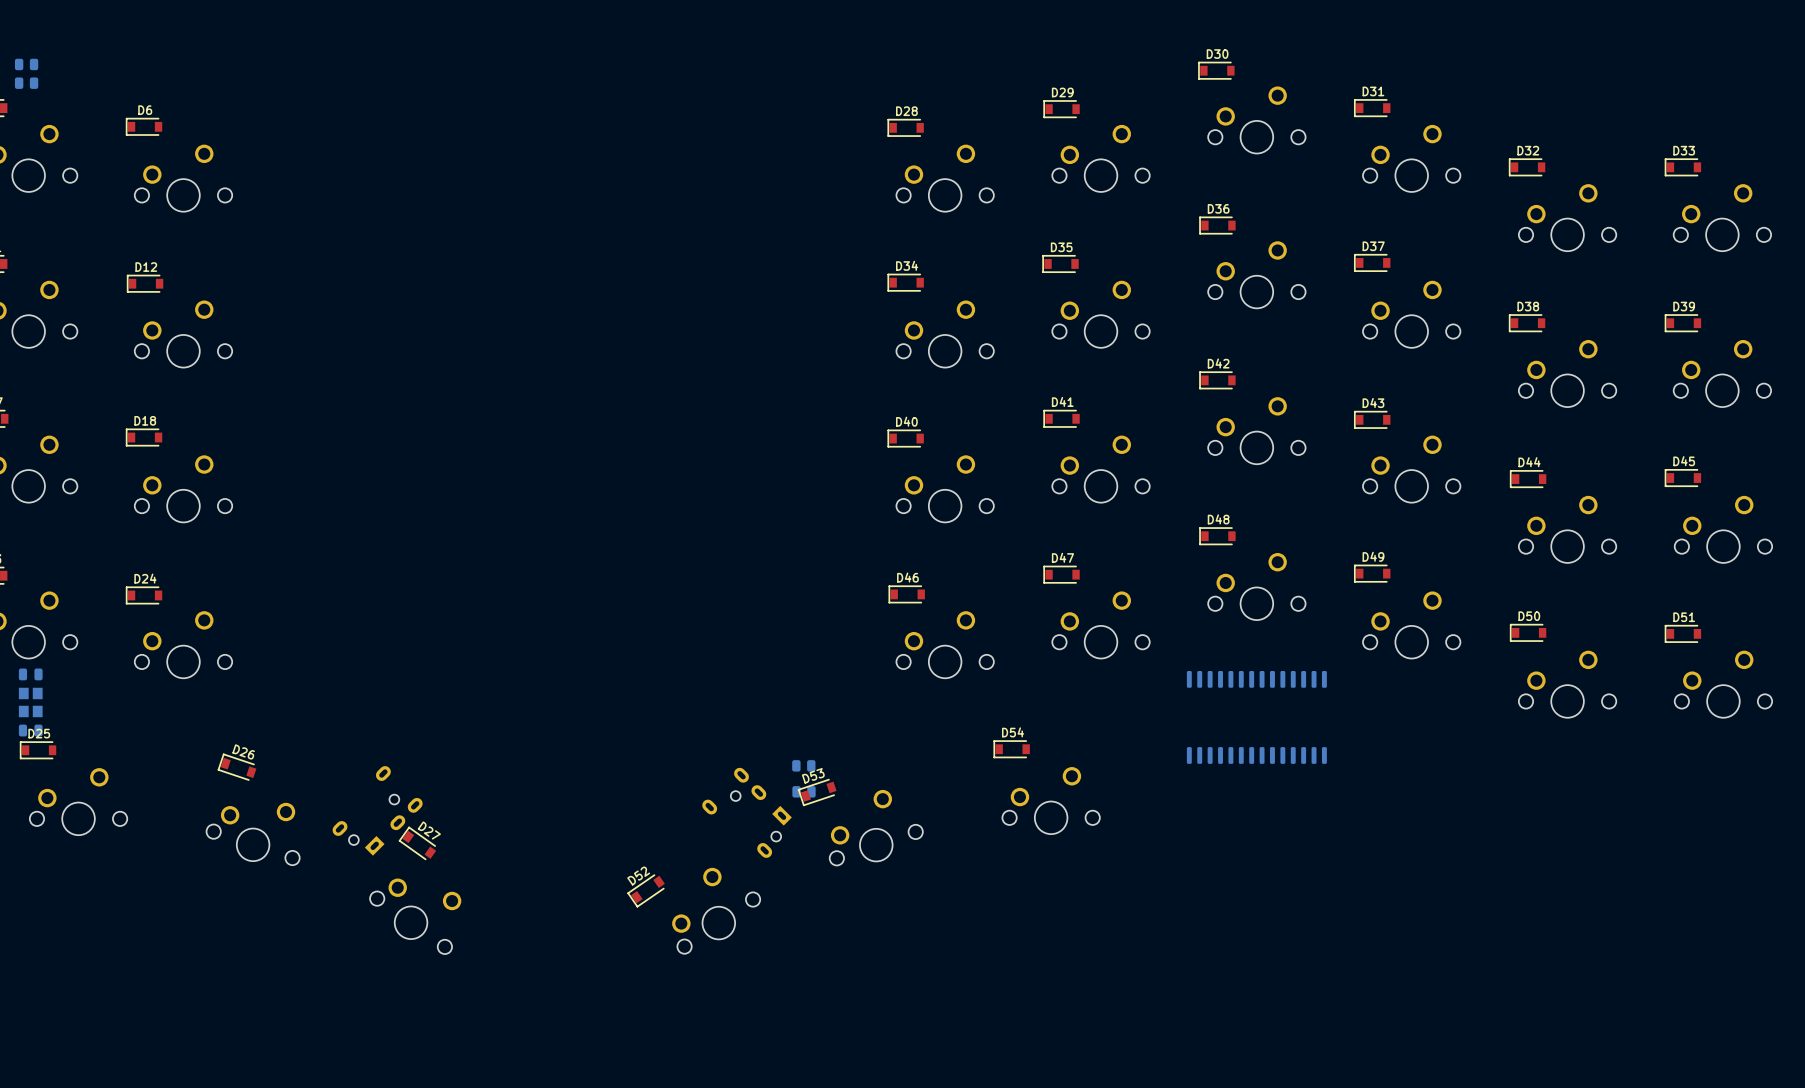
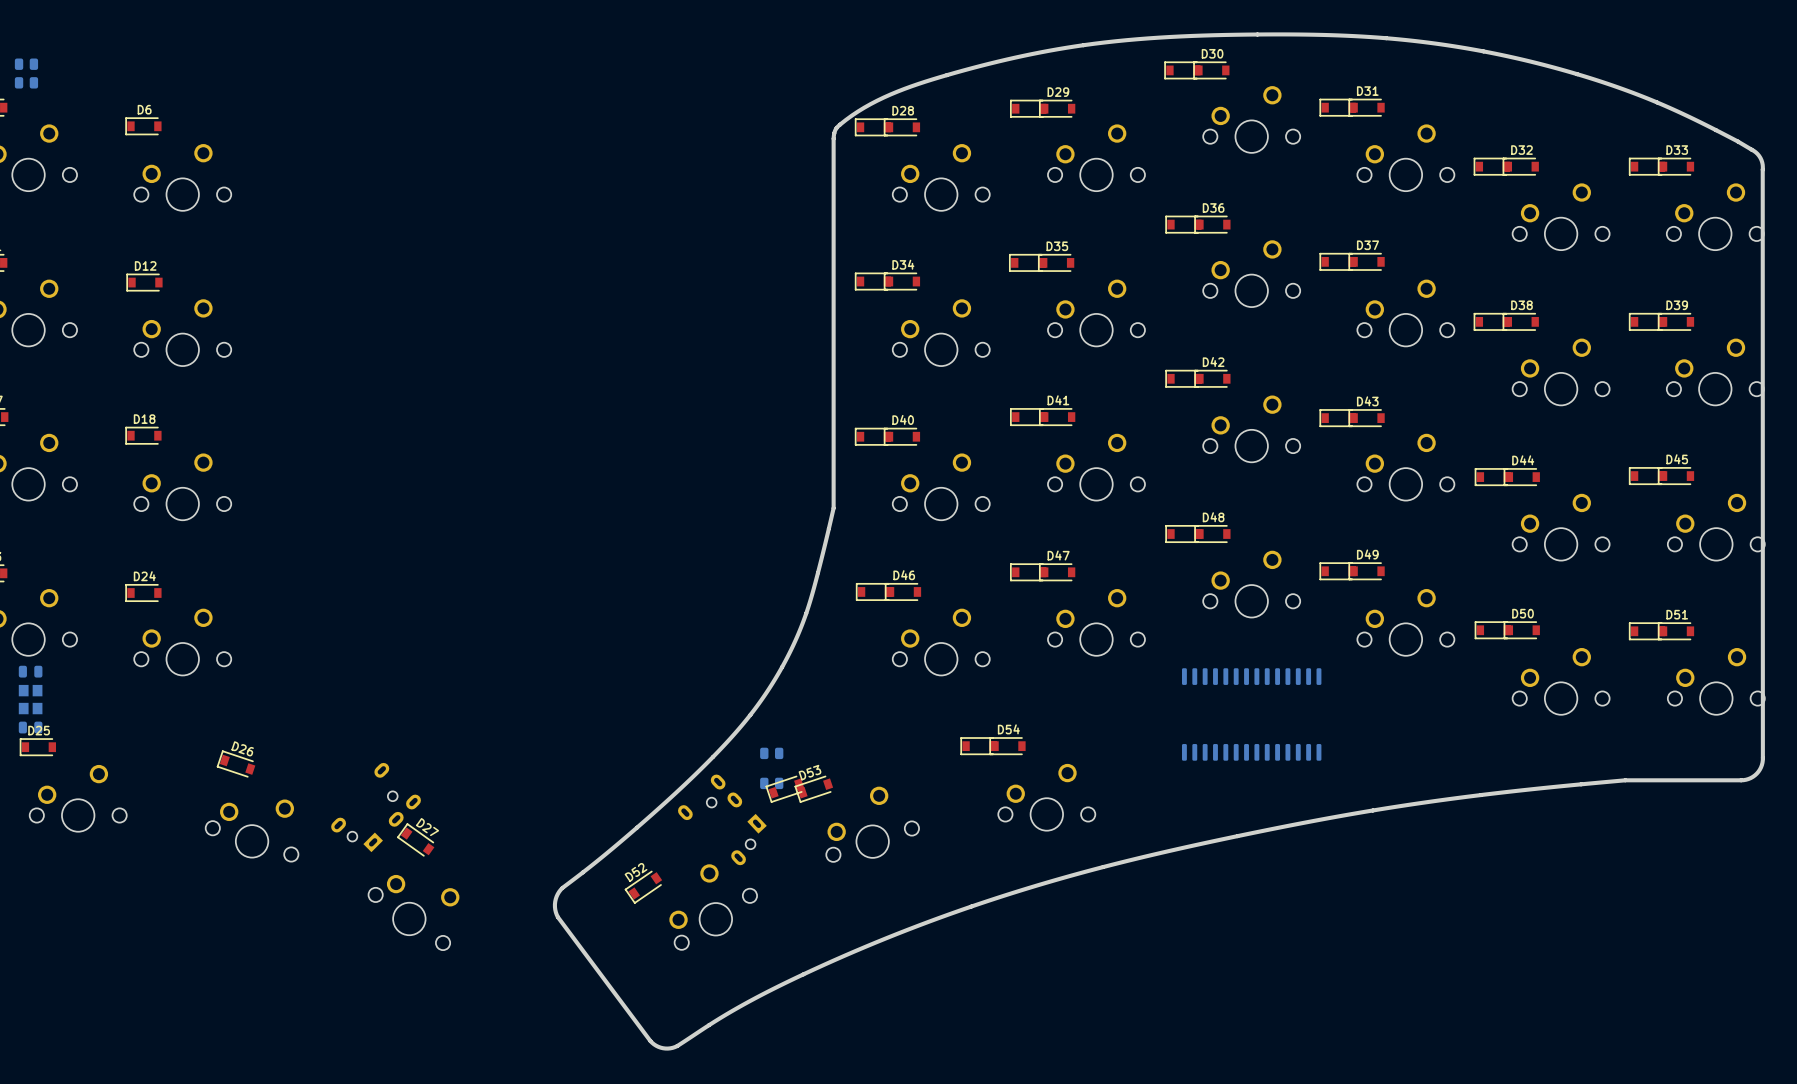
board edge: none -> (1257, 34) (1338, 35) (1404, 39) (1465, 48) (1530, 61) (1592, 78) (1652, 100) (1725, 135) (1759, 155) (1762, 167) (1762, 757) (1759, 769) (1752, 776) (1743, 780) (1625, 780) (1420, 803) (1279, 827) (1119, 862) (1004, 895) (897, 933) (834, 960) (767, 991) (726, 1014) (677, 1046) (665, 1048) (656, 1045) (650, 1041) (557, 917) (555, 901) (562, 887) (606, 853) (661, 806) (734, 733) (757, 706) (774, 679) (792, 647) (805, 616) (833, 508) (833, 138) (835, 129) (864, 107) (897, 91) (946, 75) (1014, 57) (1074, 46) (1126, 40) (1257, 34)
part: none -> (1182, 70)
part: none -> (1337, 107)
part: none -> (1028, 108)
part: none -> (873, 127)
part: none -> (1491, 166)
part: none -> (1647, 166)
part: none -> (1183, 224)
part: none -> (1337, 261)
part: none -> (1027, 262)
part: none -> (873, 281)
part: none -> (1491, 321)
part: none -> (1647, 321)
part: none -> (1183, 378)
part: none -> (1028, 417)
part: none -> (1337, 418)
part: none -> (873, 436)
part: none -> (1647, 476)
part: none -> (1493, 477)
part: none -> (1183, 534)
part: none -> (1337, 571)
part: none -> (1028, 572)
part: none -> (874, 591)
part: none -> (1492, 630)
part: none -> (1647, 631)
part: none -> (978, 746)
part: none -> (771, 753)
part: (803, 765) -> none
part: none -> (771, 783)
part: (804, 791) -> none
part: none -> (785, 789)
part: (747, 812) -> none
part: none -> (722, 819)

